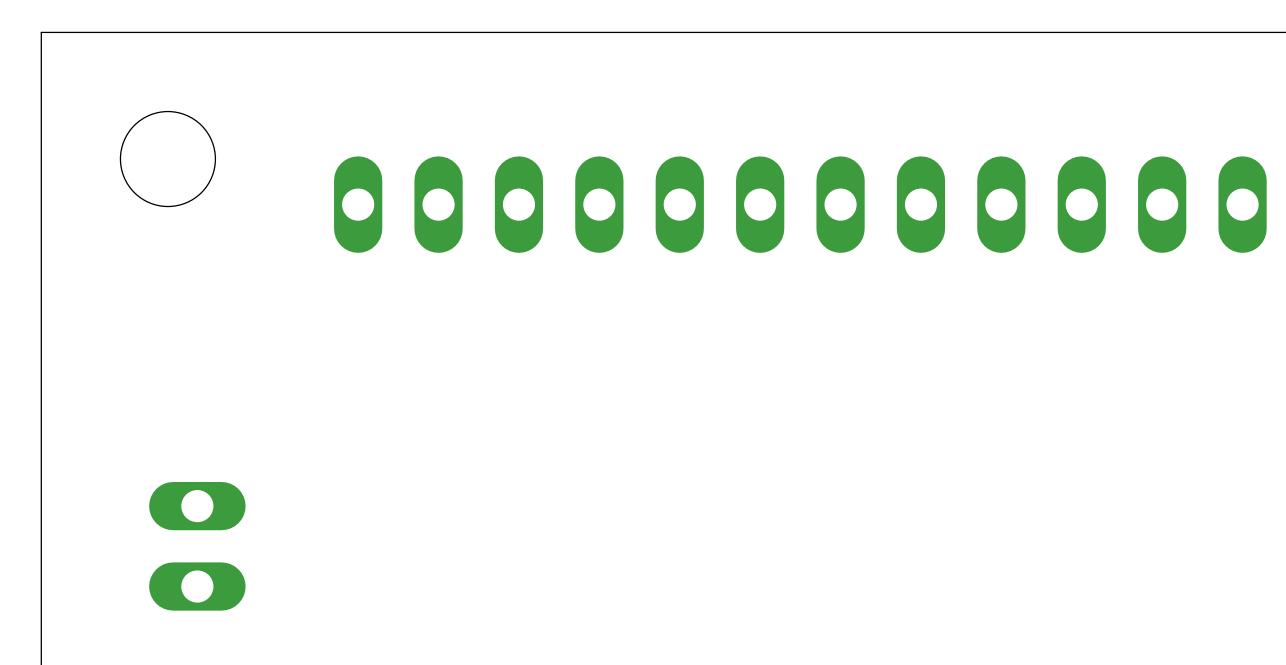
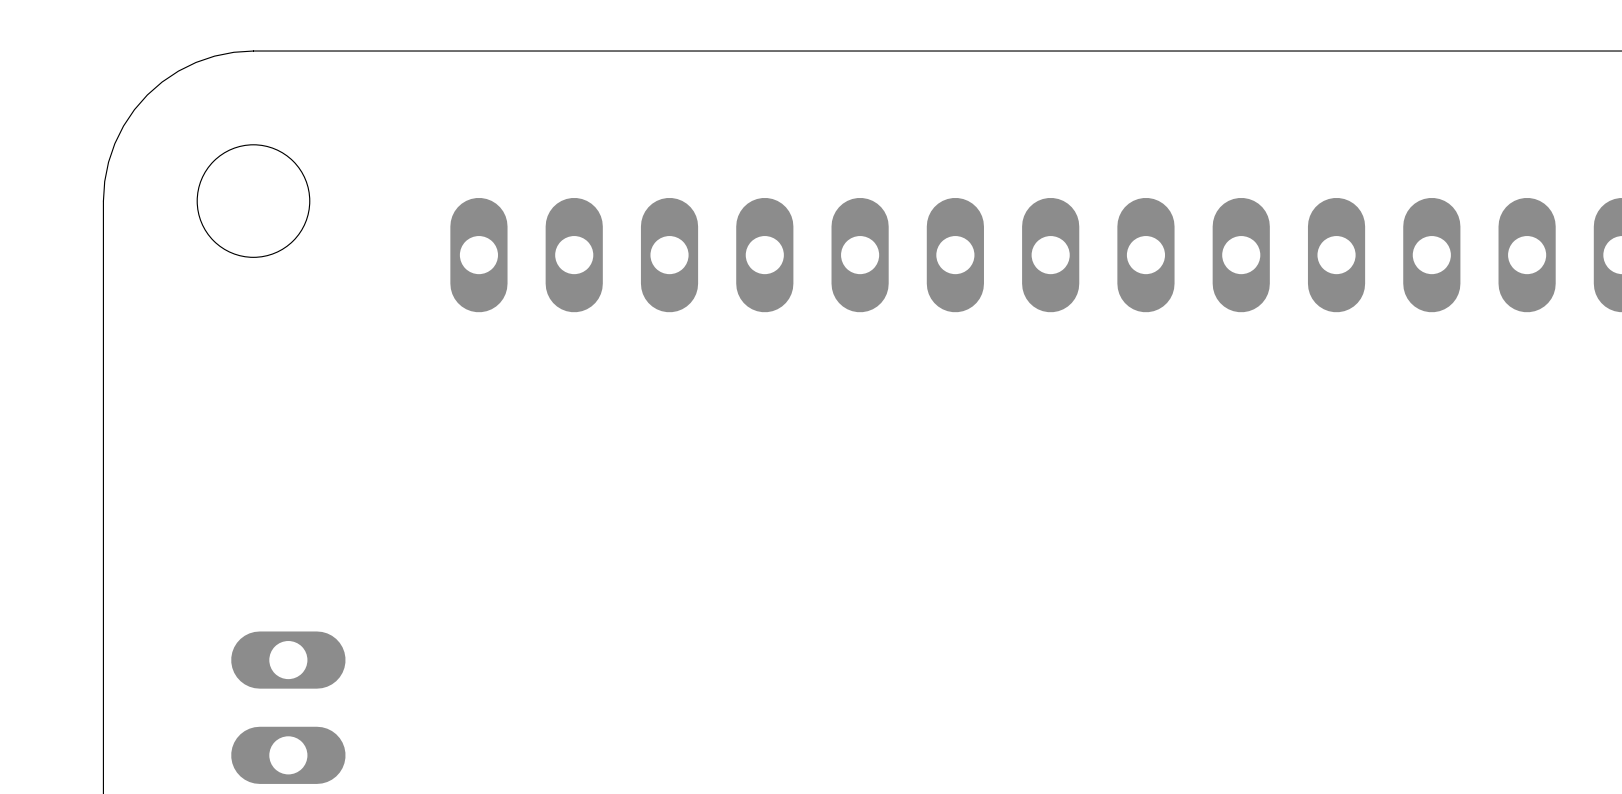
board edge: (167, 32) (41, 32) (41, 159) -> (253, 51) (233, 52) (196, 62) (178, 71) (147, 94) (123, 126) (114, 143) (104, 181) (103, 201)
part position: (197, 546) -> (288, 707)

